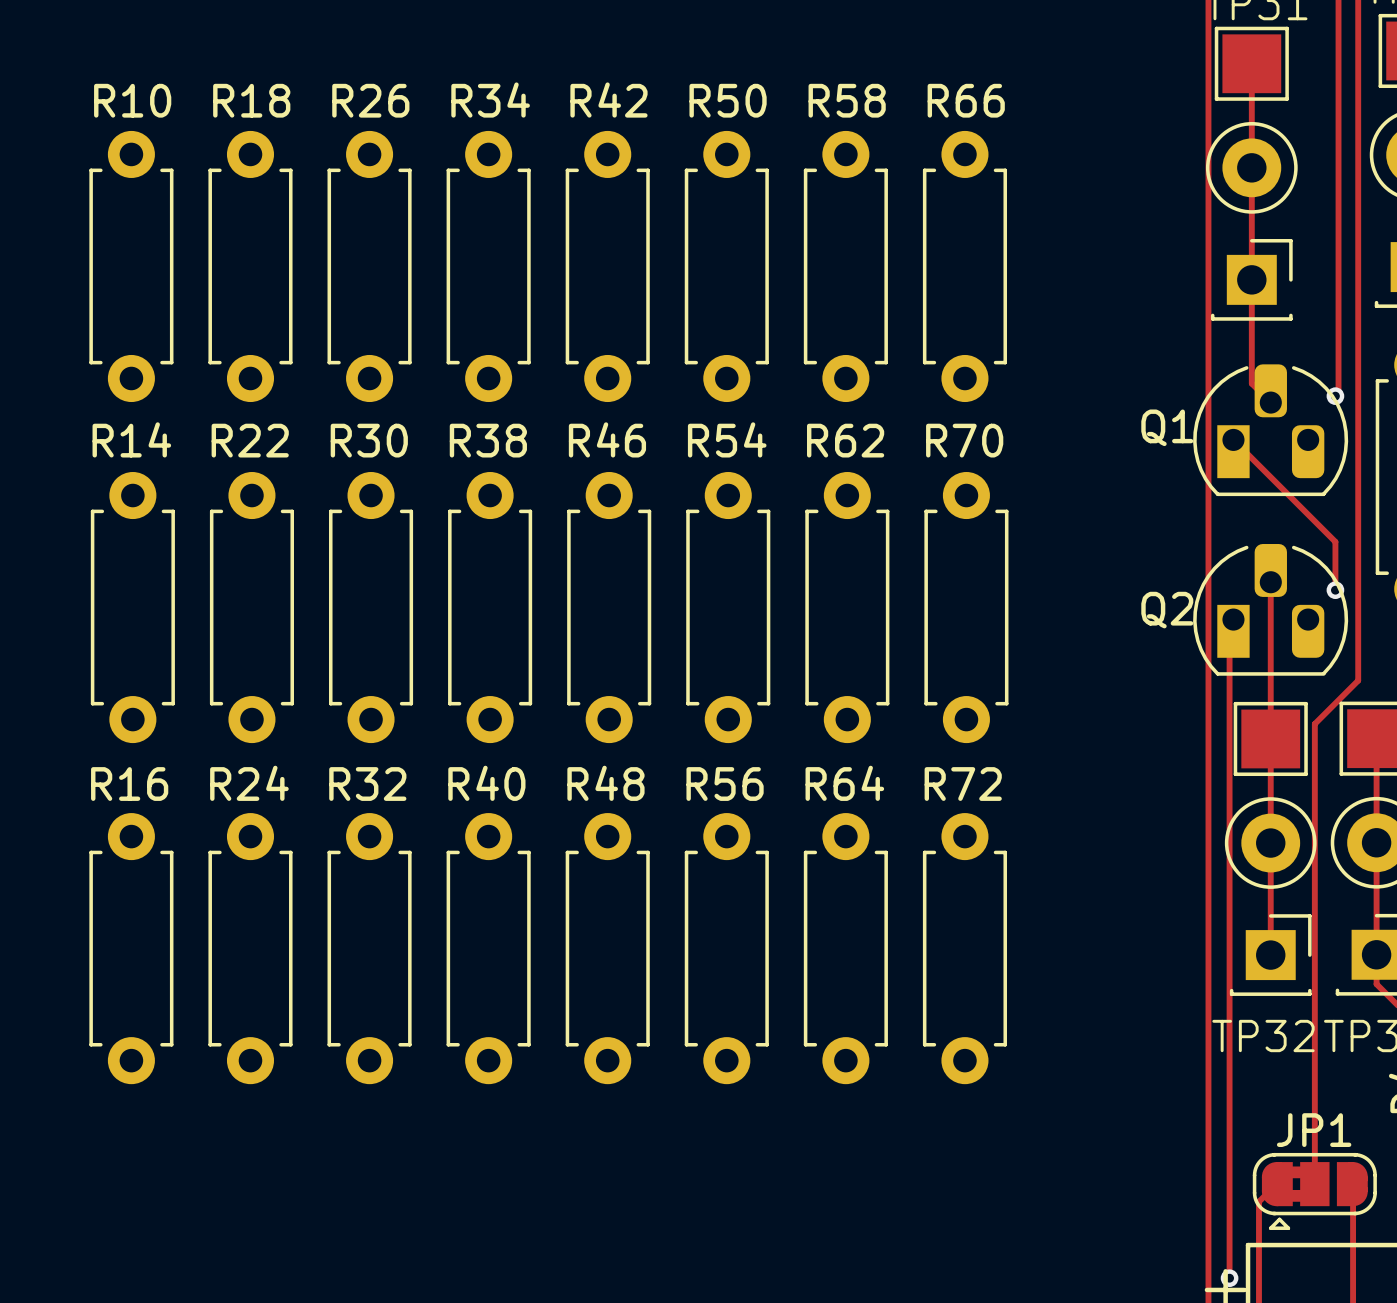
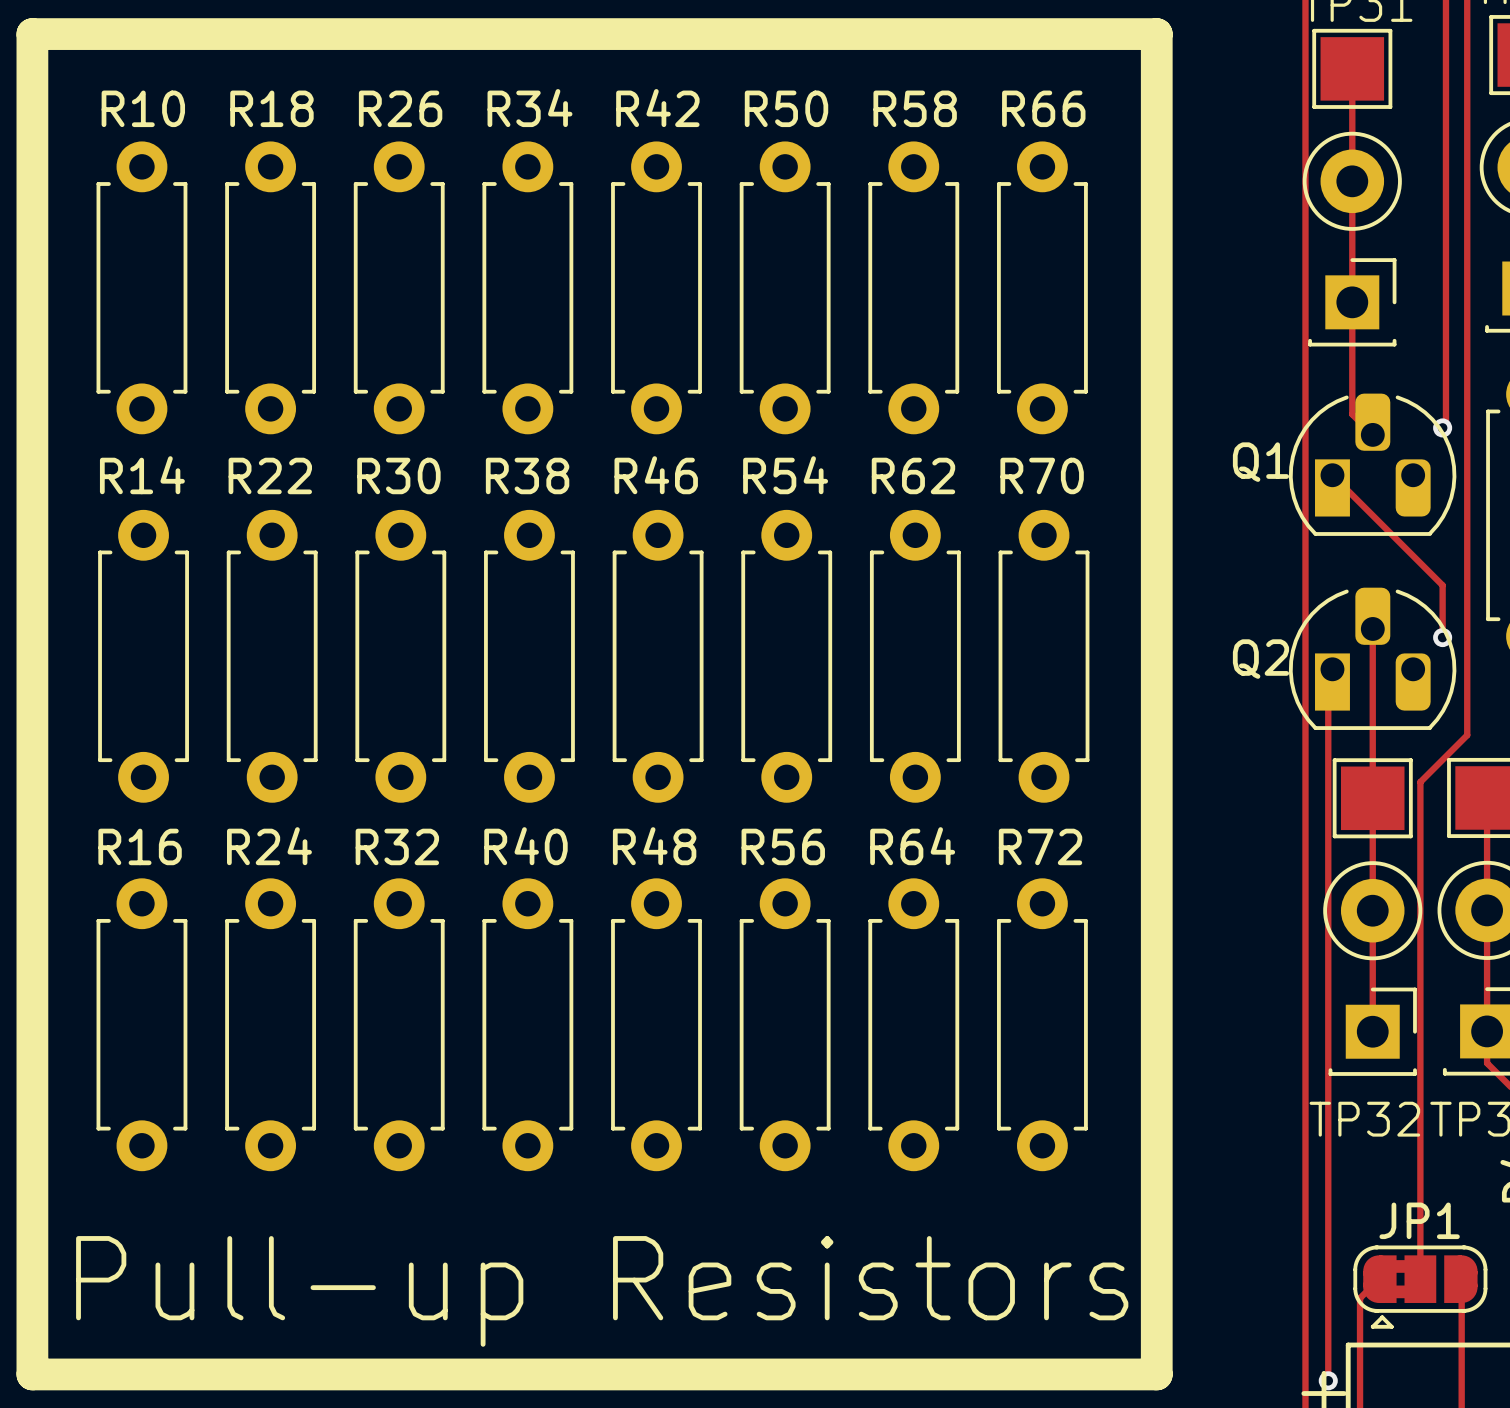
line: none -> (32, 34) (32, 1374) (1156, 1374) (1156, 34) (32, 34)
text: none -> Pull-up Resistors (602, 1291)

